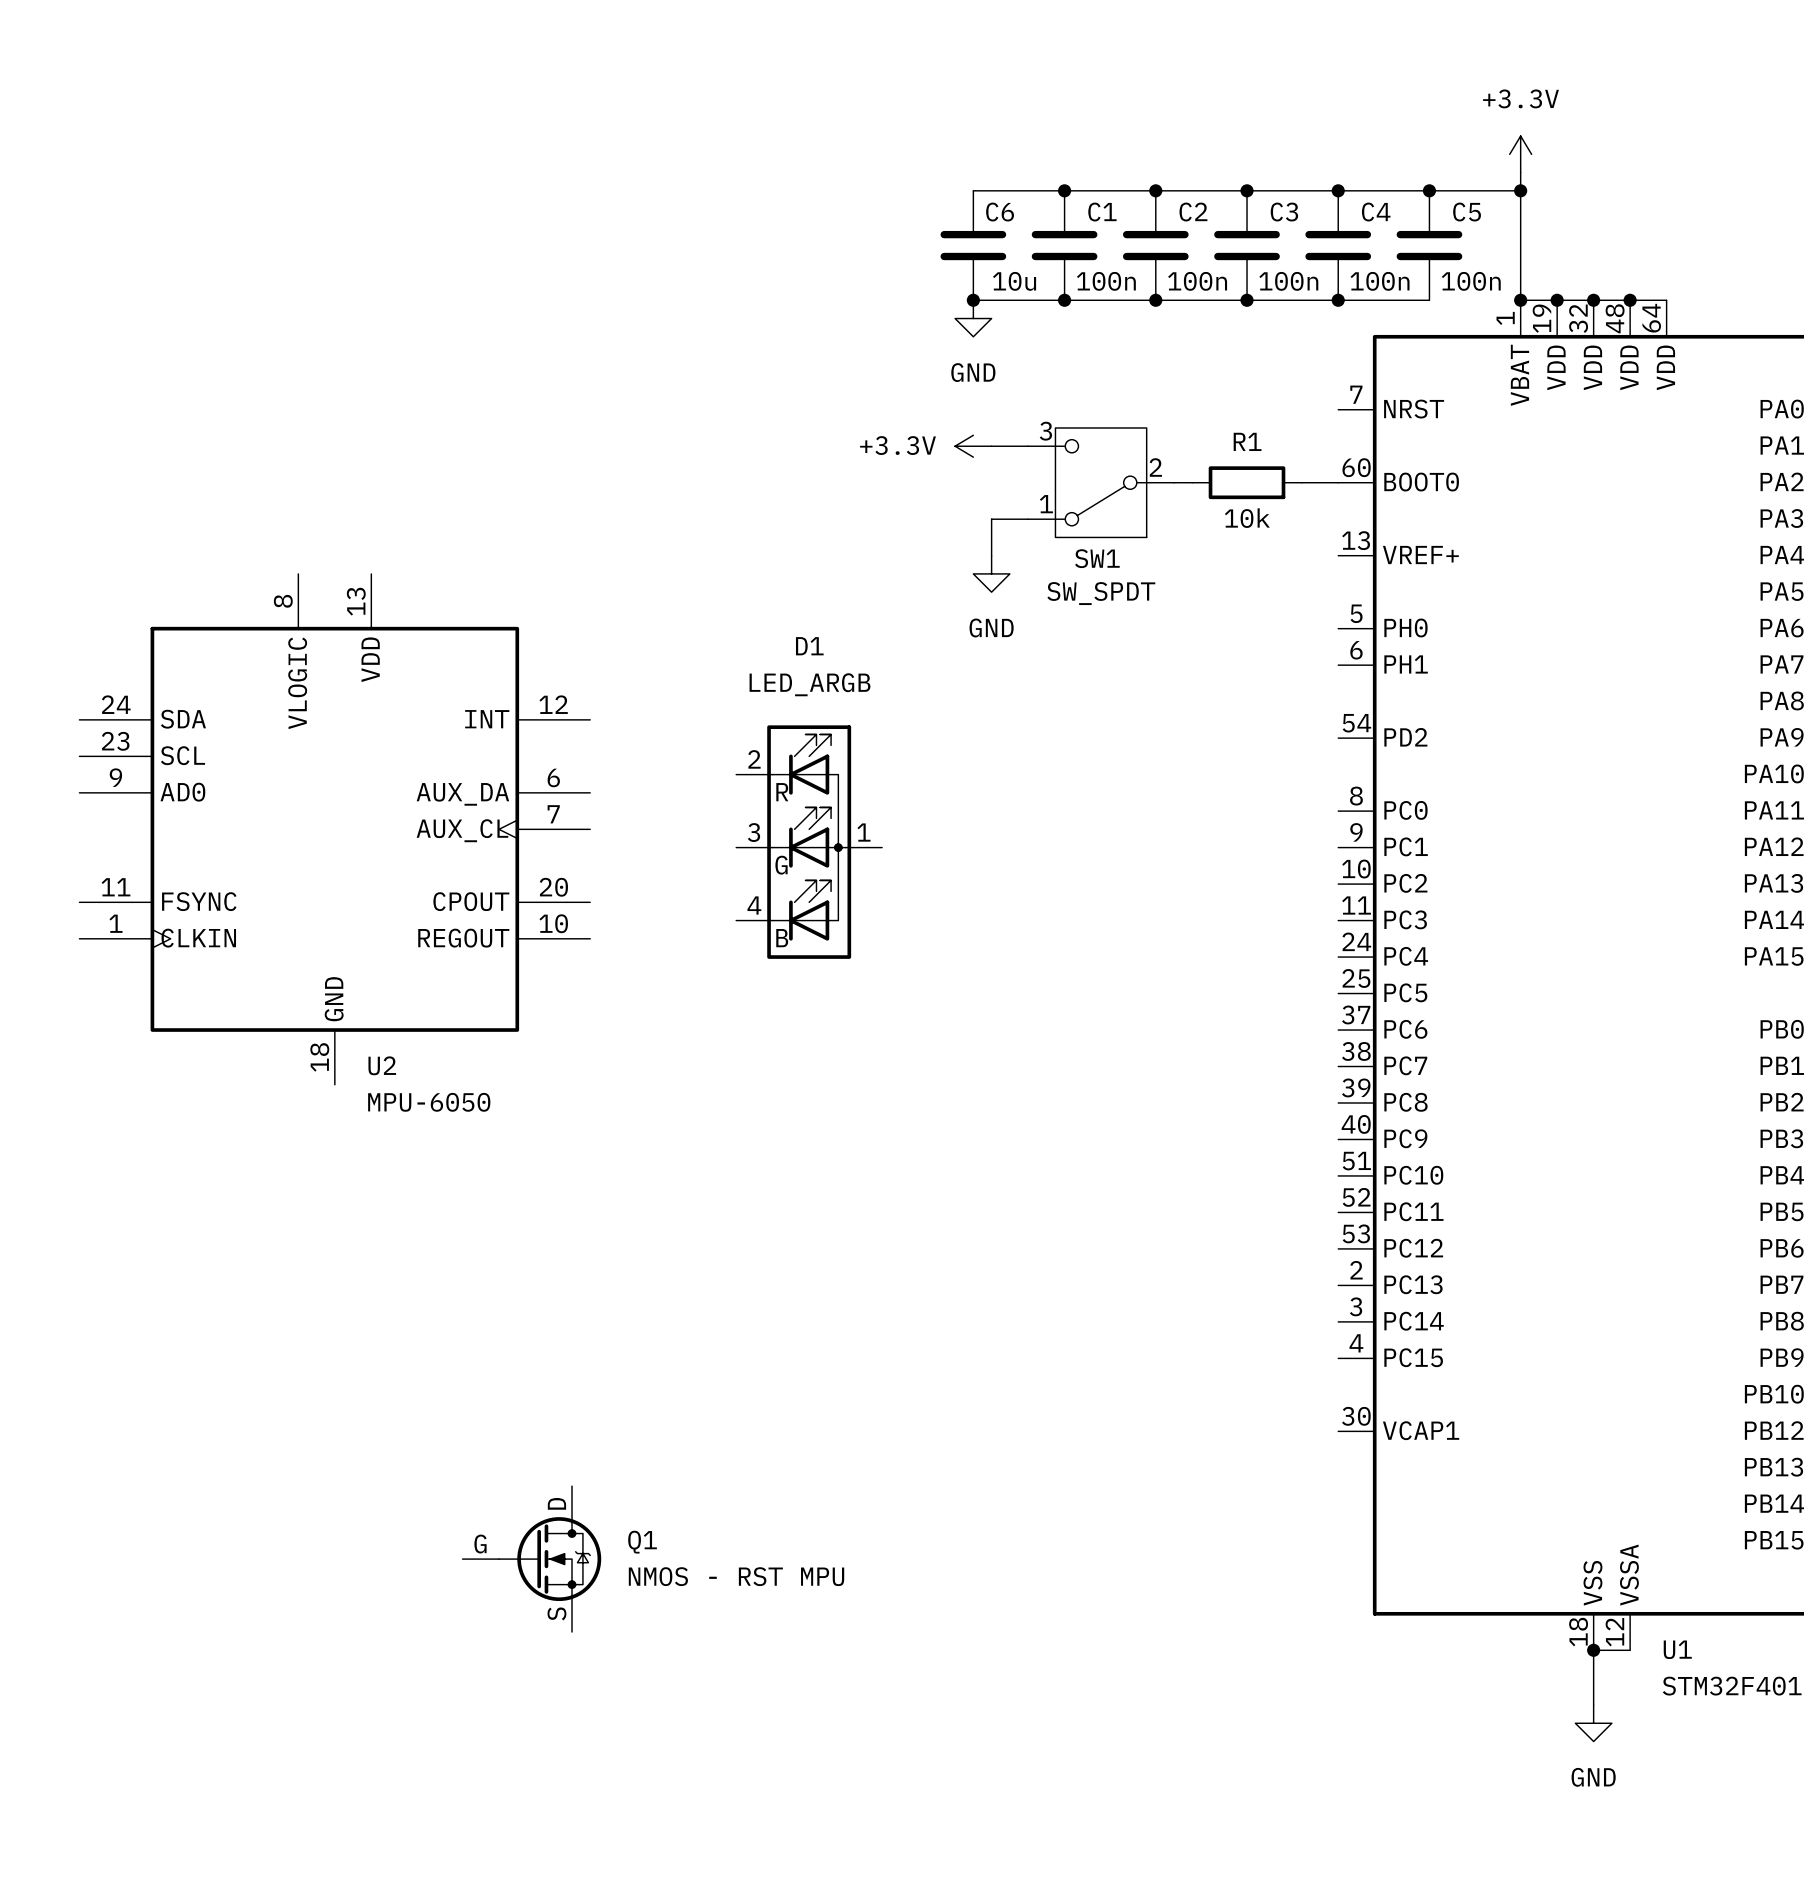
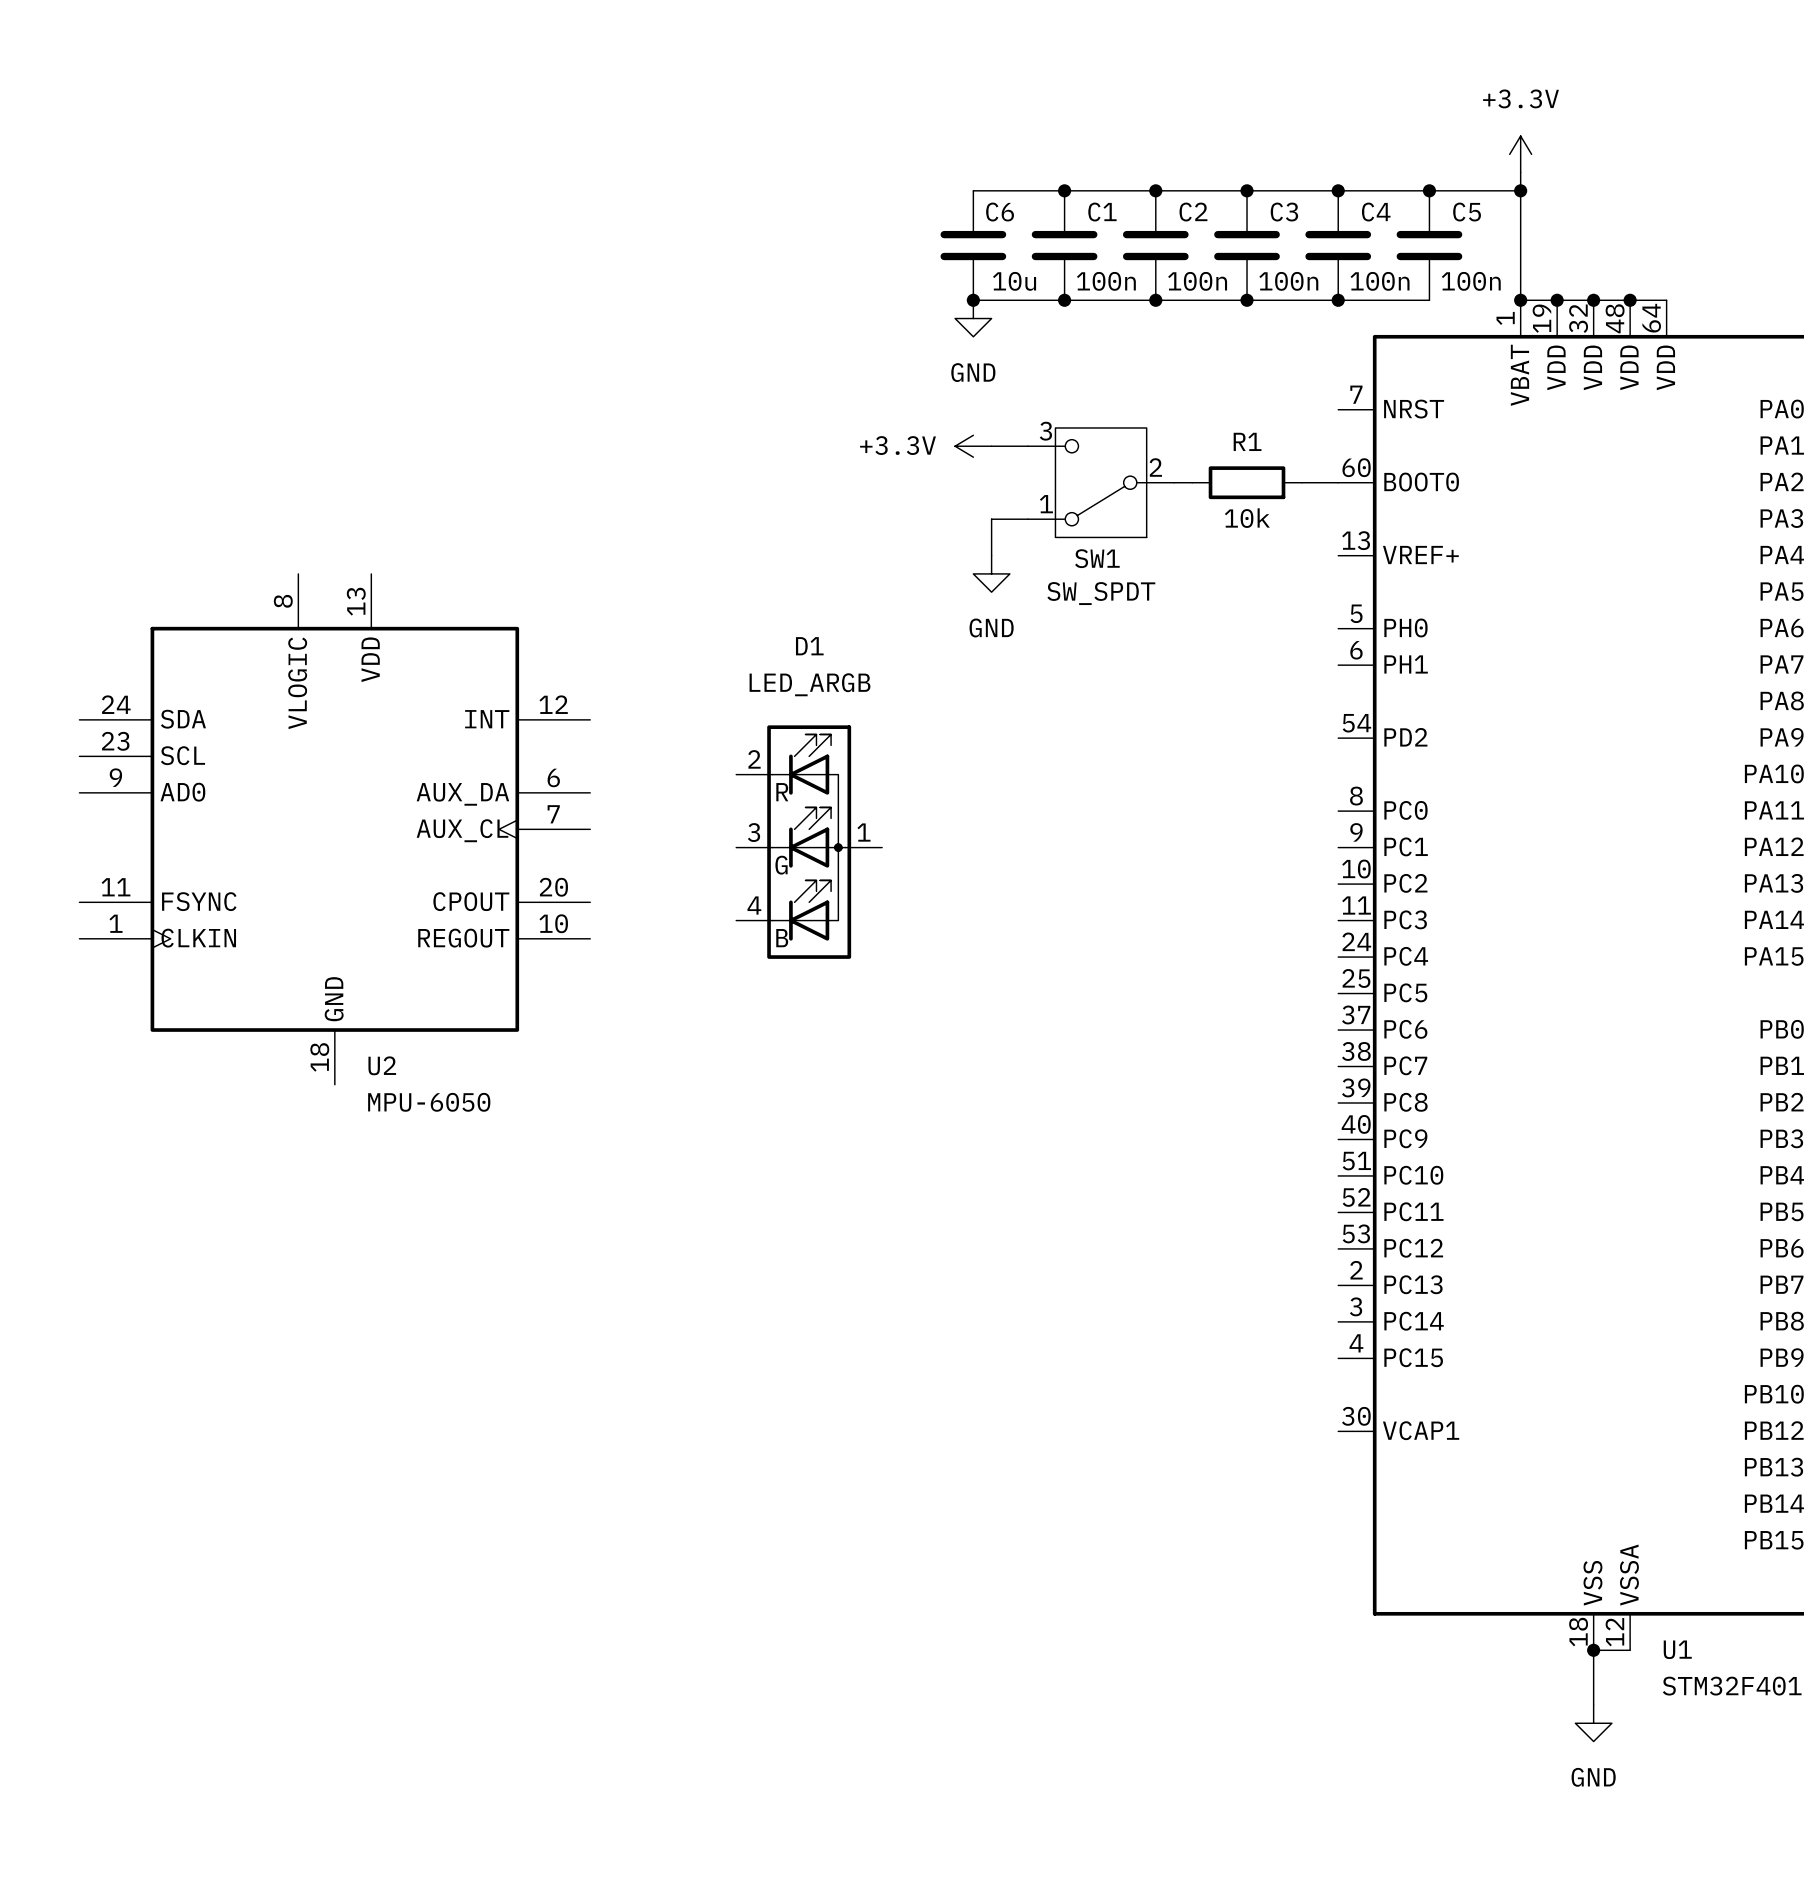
Q1: NMOS - RST MPU (531, 1559) -> none

